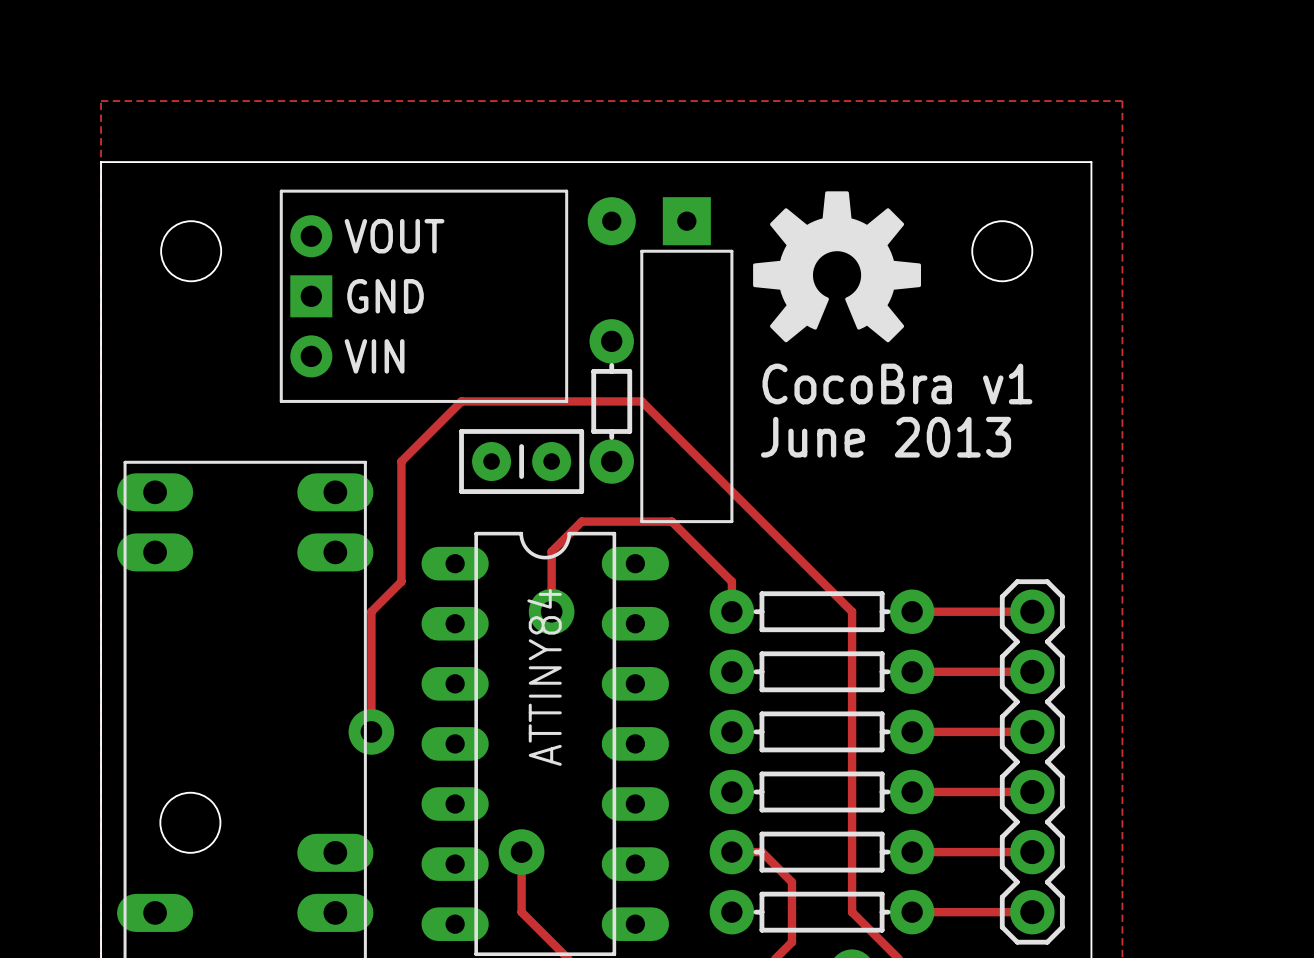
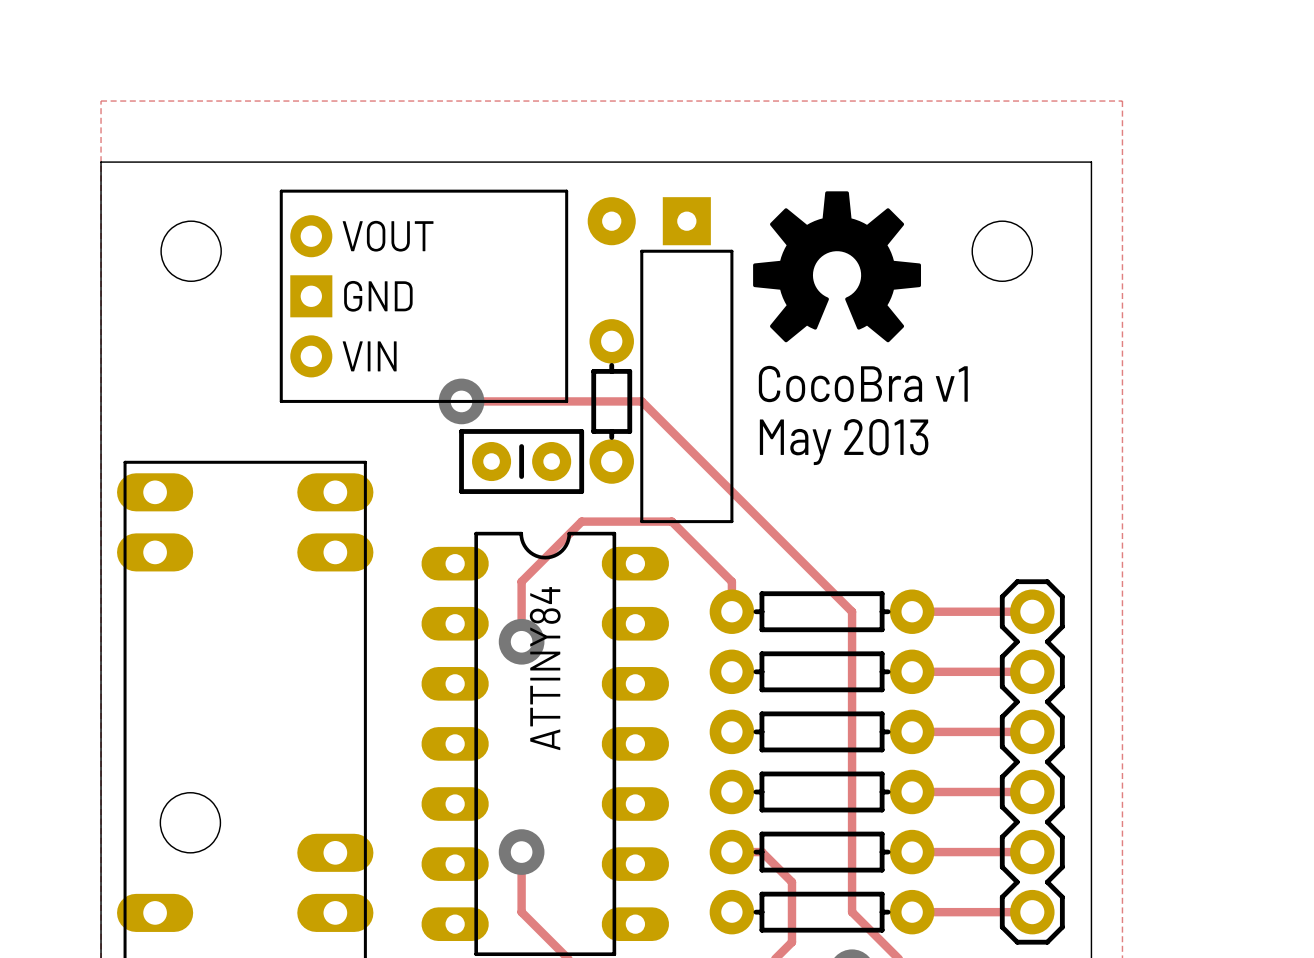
track: (461, 401) (401, 461) (401, 581) (371, 611) (371, 731) -> none
via: none -> (461, 401)
text: June 2013 (886, 437) -> May 2013 (844, 442)
track: (551, 551) (551, 611) -> (551, 551) (521, 581) (521, 641)
via position: (551, 611) -> (521, 641)
via: (371, 731) -> none

